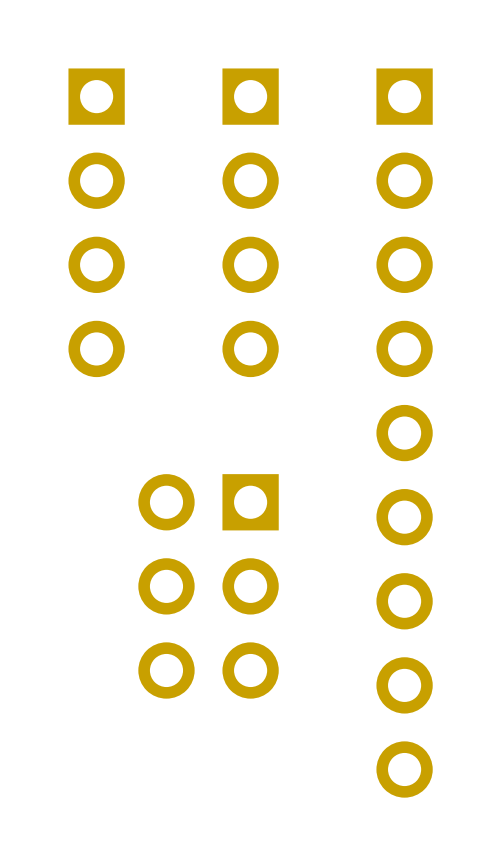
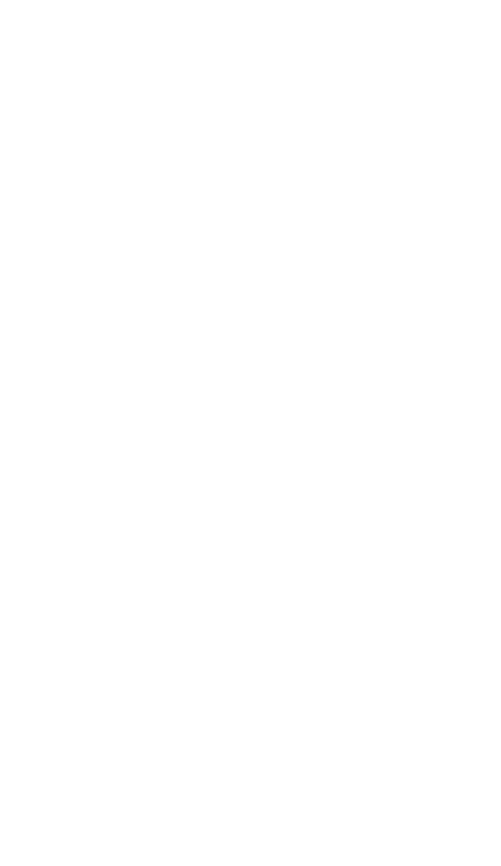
part: (96, 222) -> none
part: (250, 222) -> none
part: (404, 433) -> none
part: (208, 586) -> none

